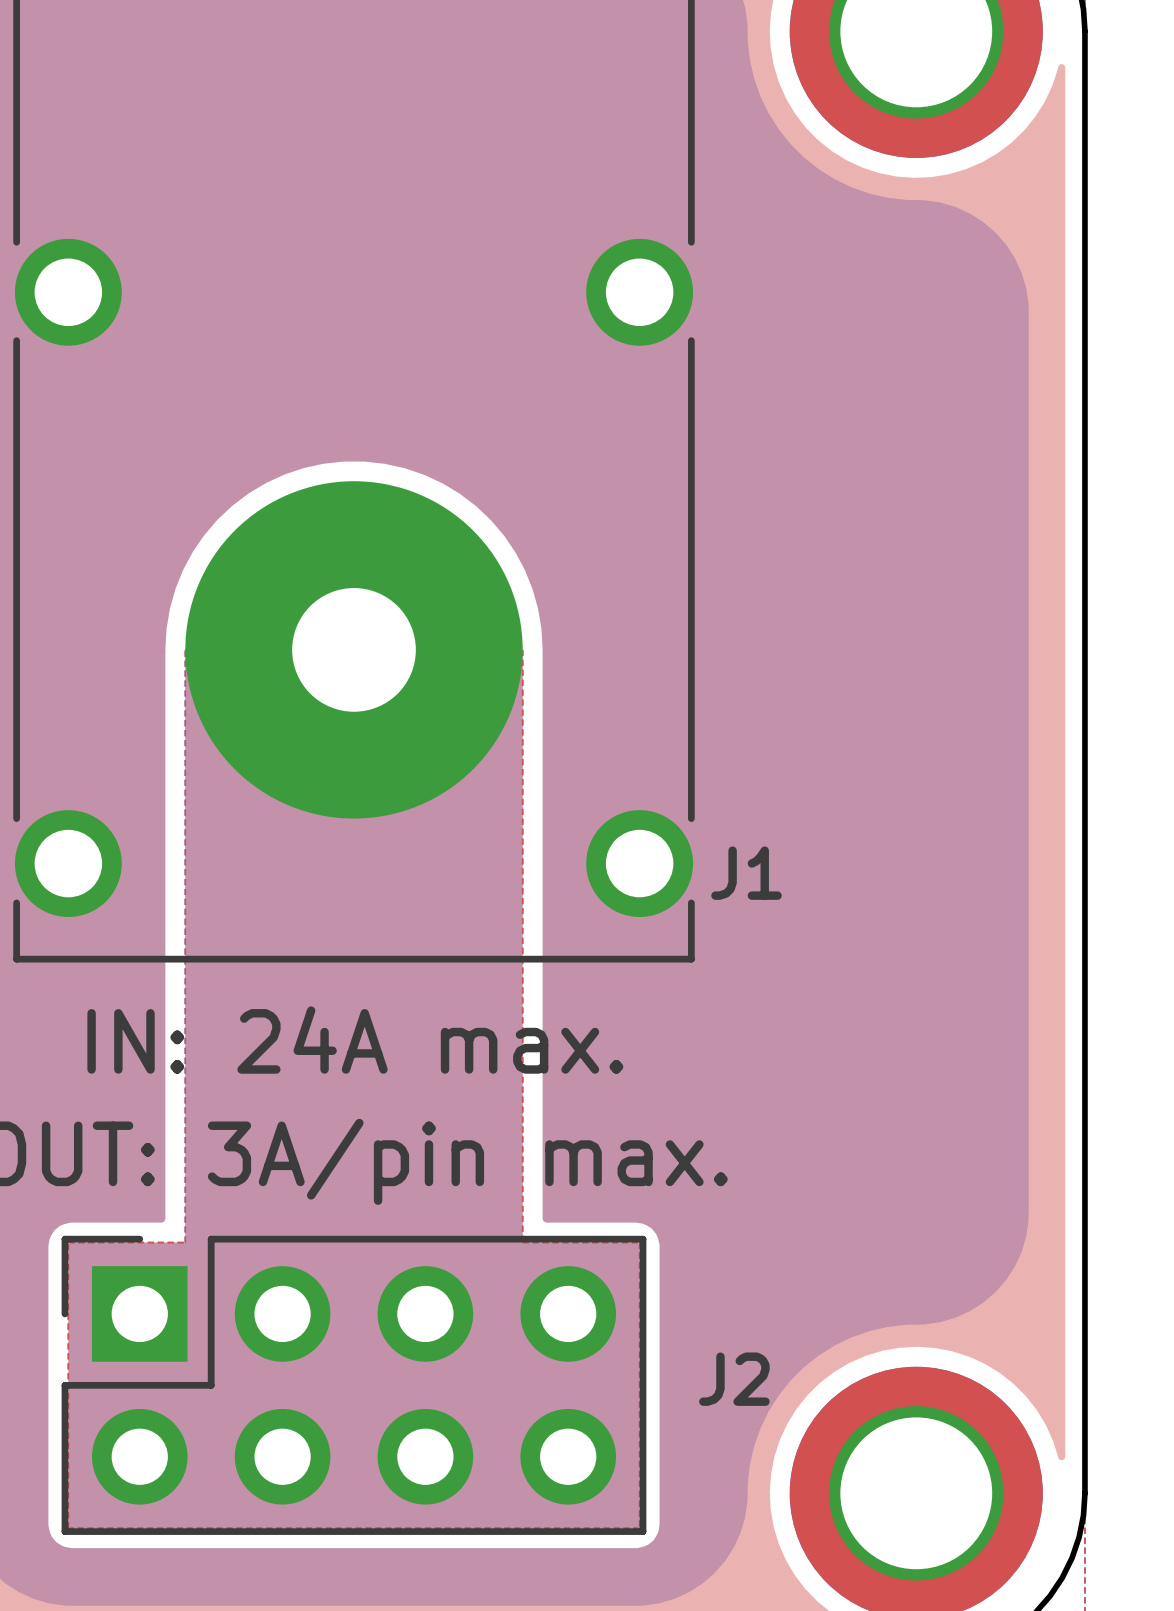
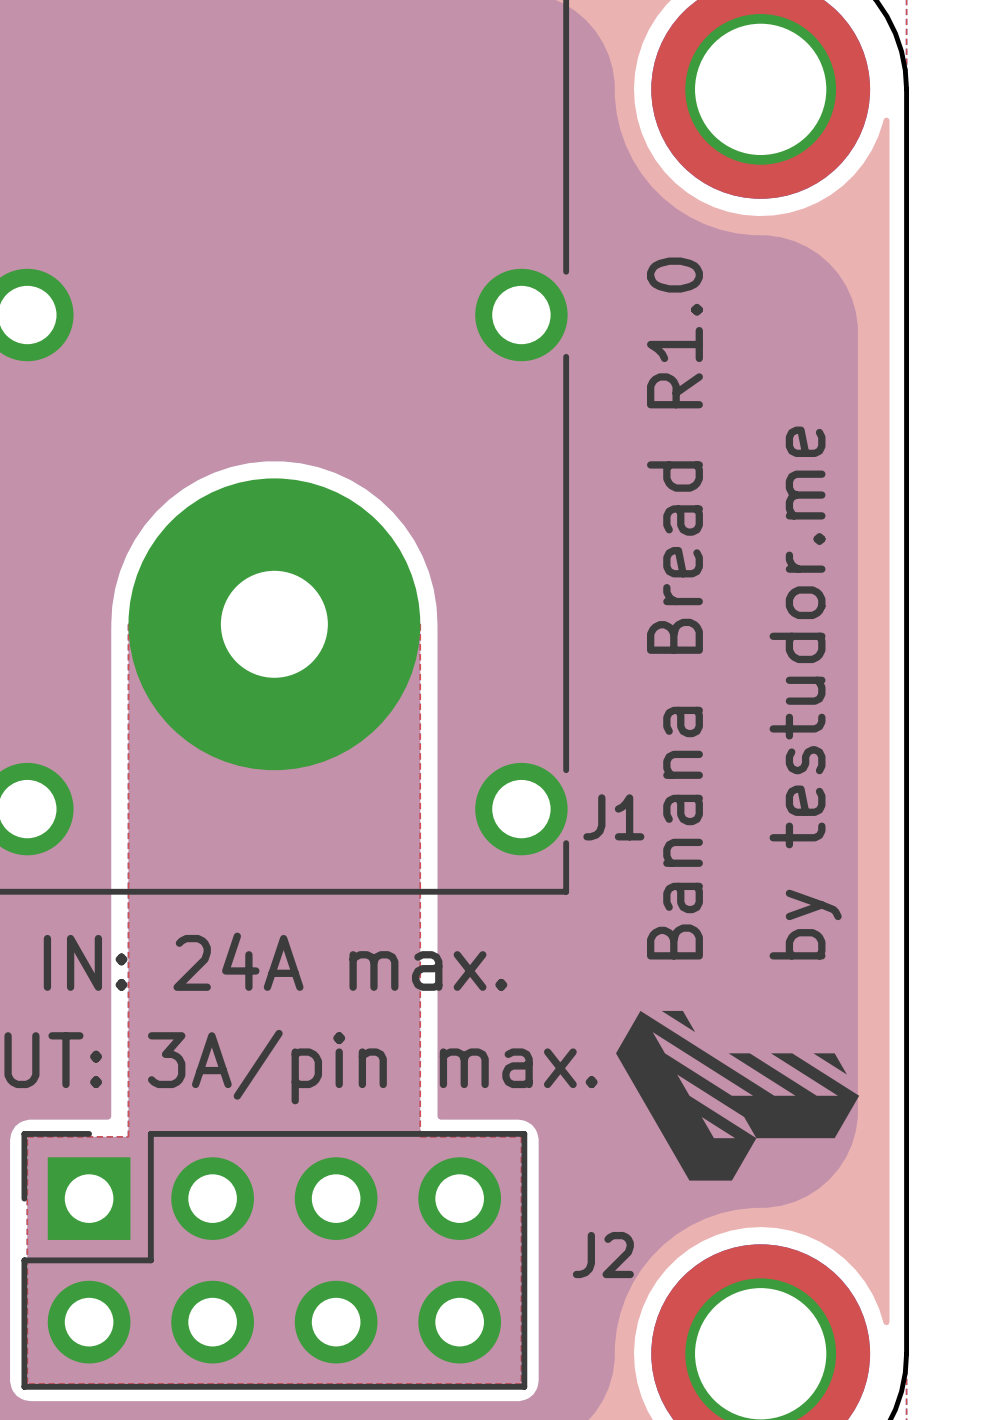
text: none -> Banana Bread R1.0 (674, 608)
text: none -> by testudor.me (805, 693)
drawing: none -> [616, 1010, 860, 1181]

